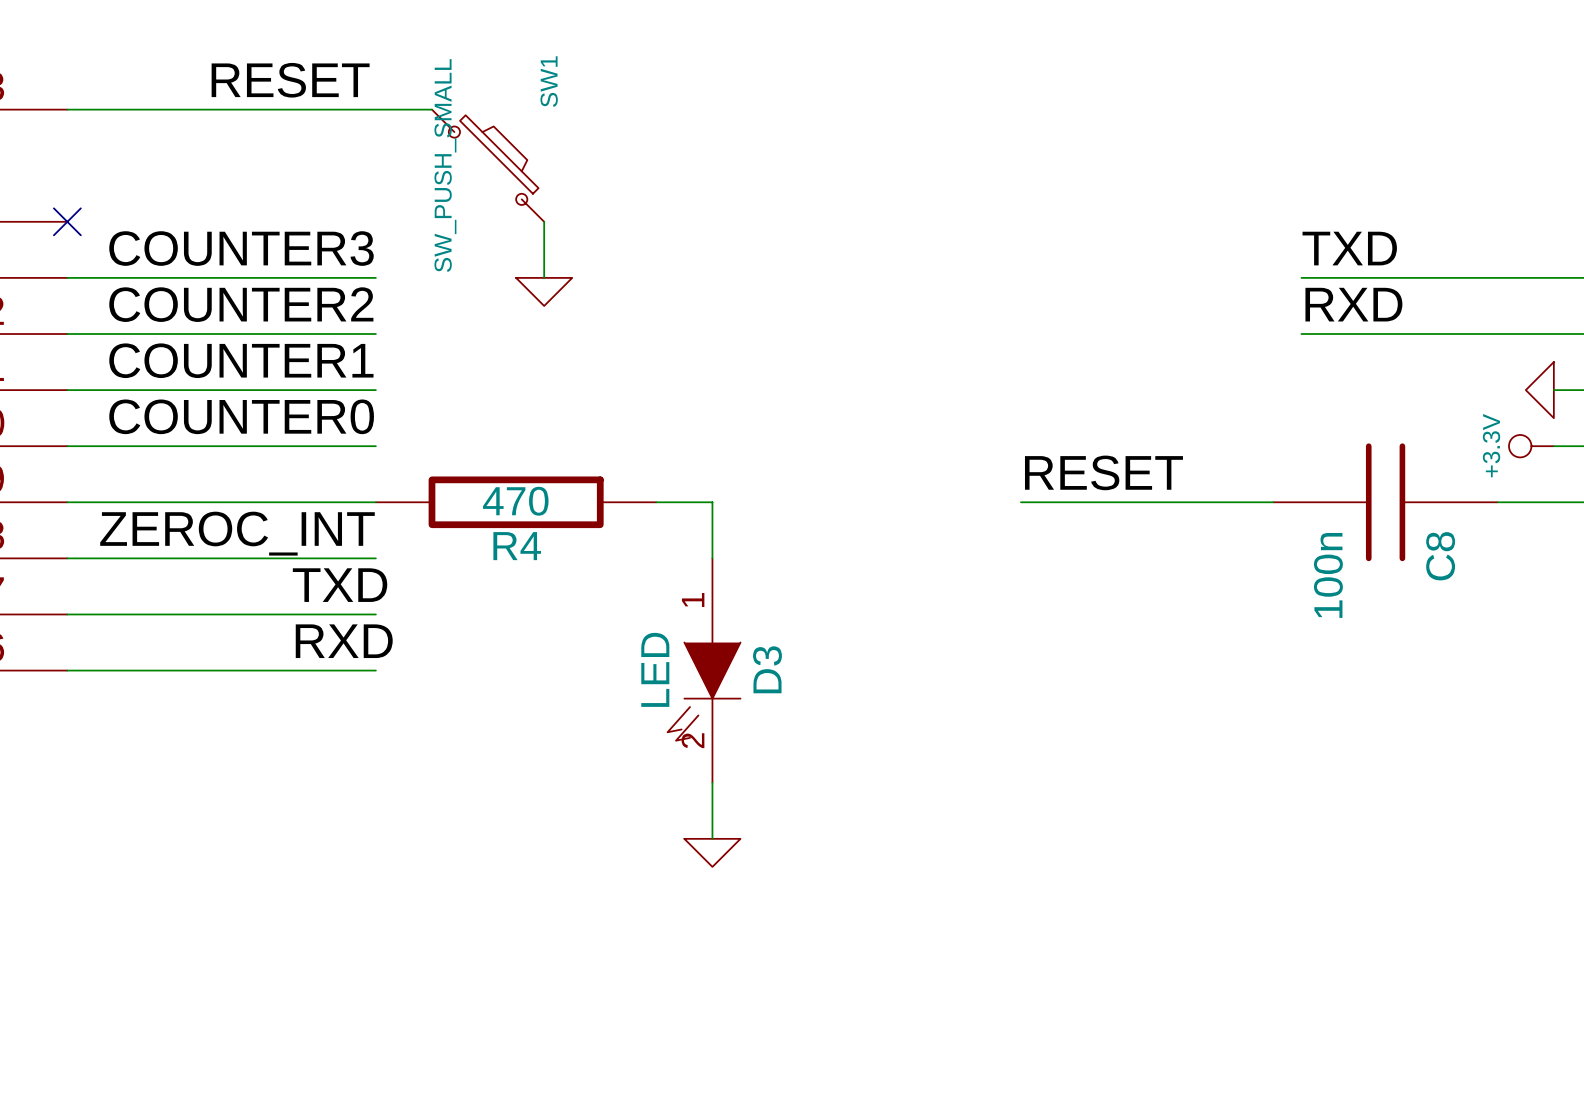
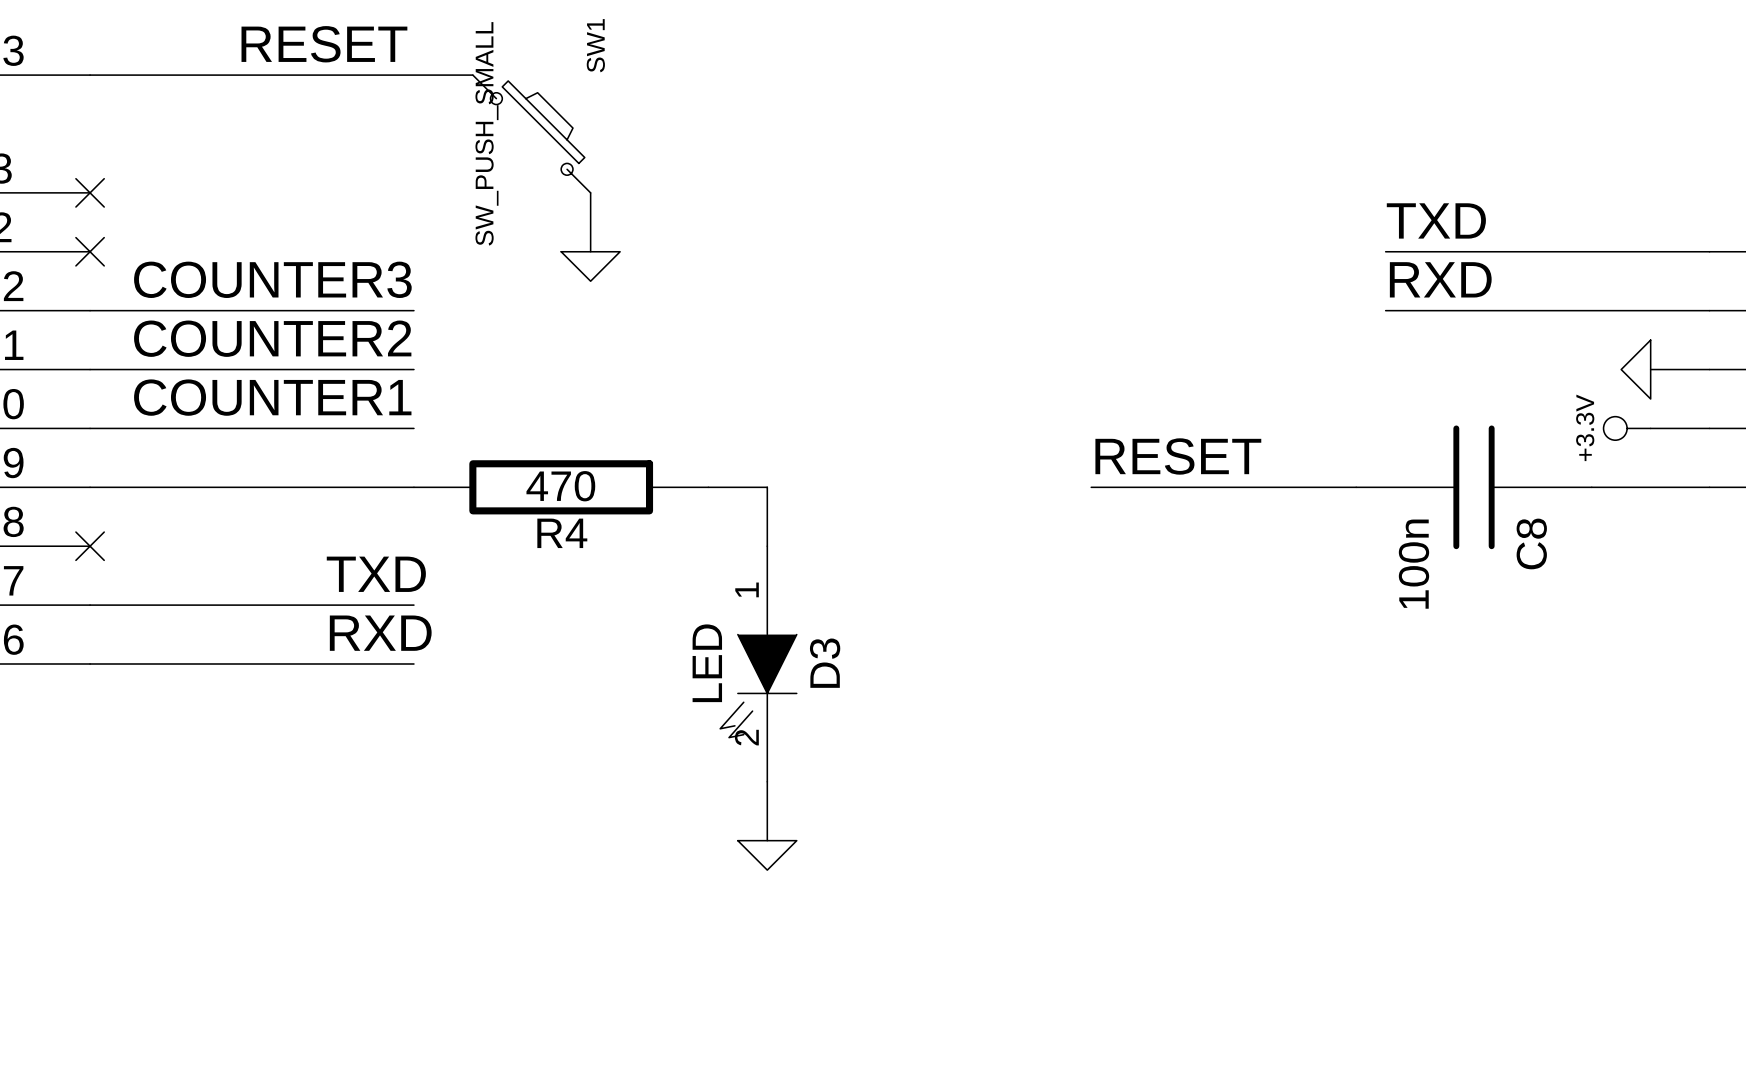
label: COUNTER3 (241, 248) -> none
wire: (67, 277) (375, 277) -> none
no-connect mark: none -> (90, 251)
label: COUNTER2 (241, 304) -> COUNTER3 (272, 279)
label: COUNTER1 (241, 360) -> COUNTER2 (272, 338)
label: COUNTER0 (241, 416) -> COUNTER1 (272, 397)
label: ZEROC_INT (237, 533) -> none
wire: (67, 558) (375, 558) -> none
no-connect mark: none -> (90, 546)

